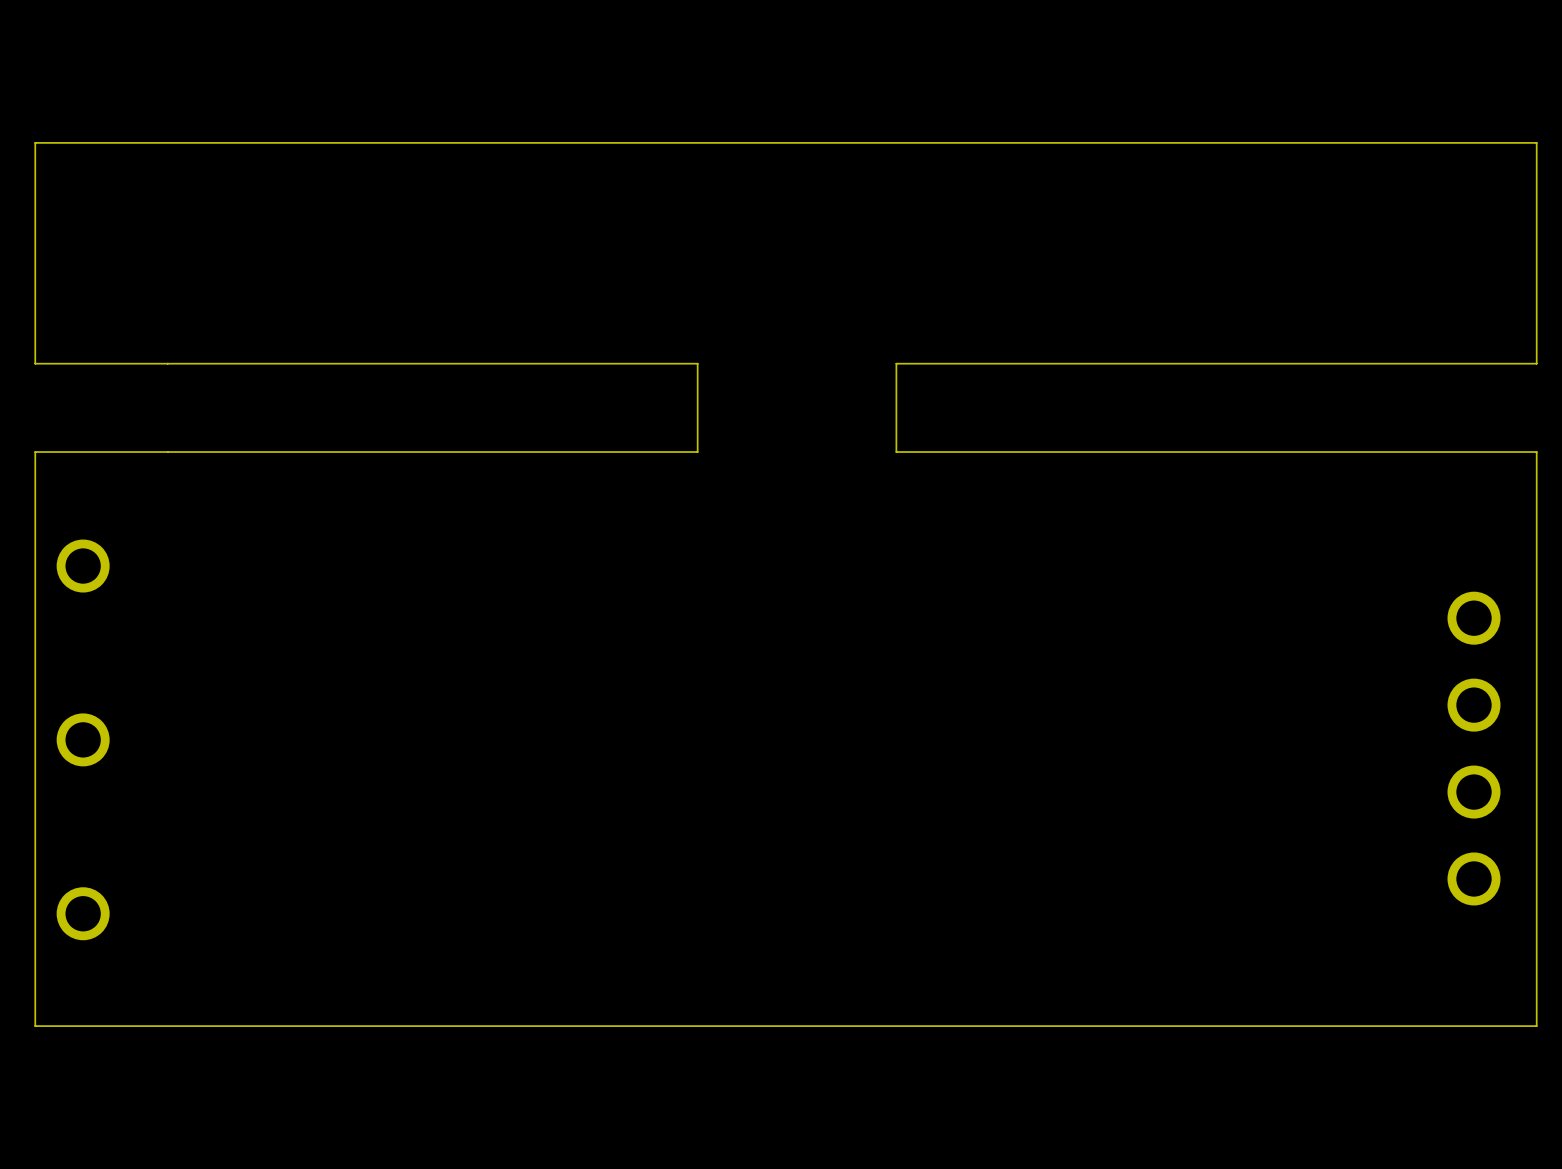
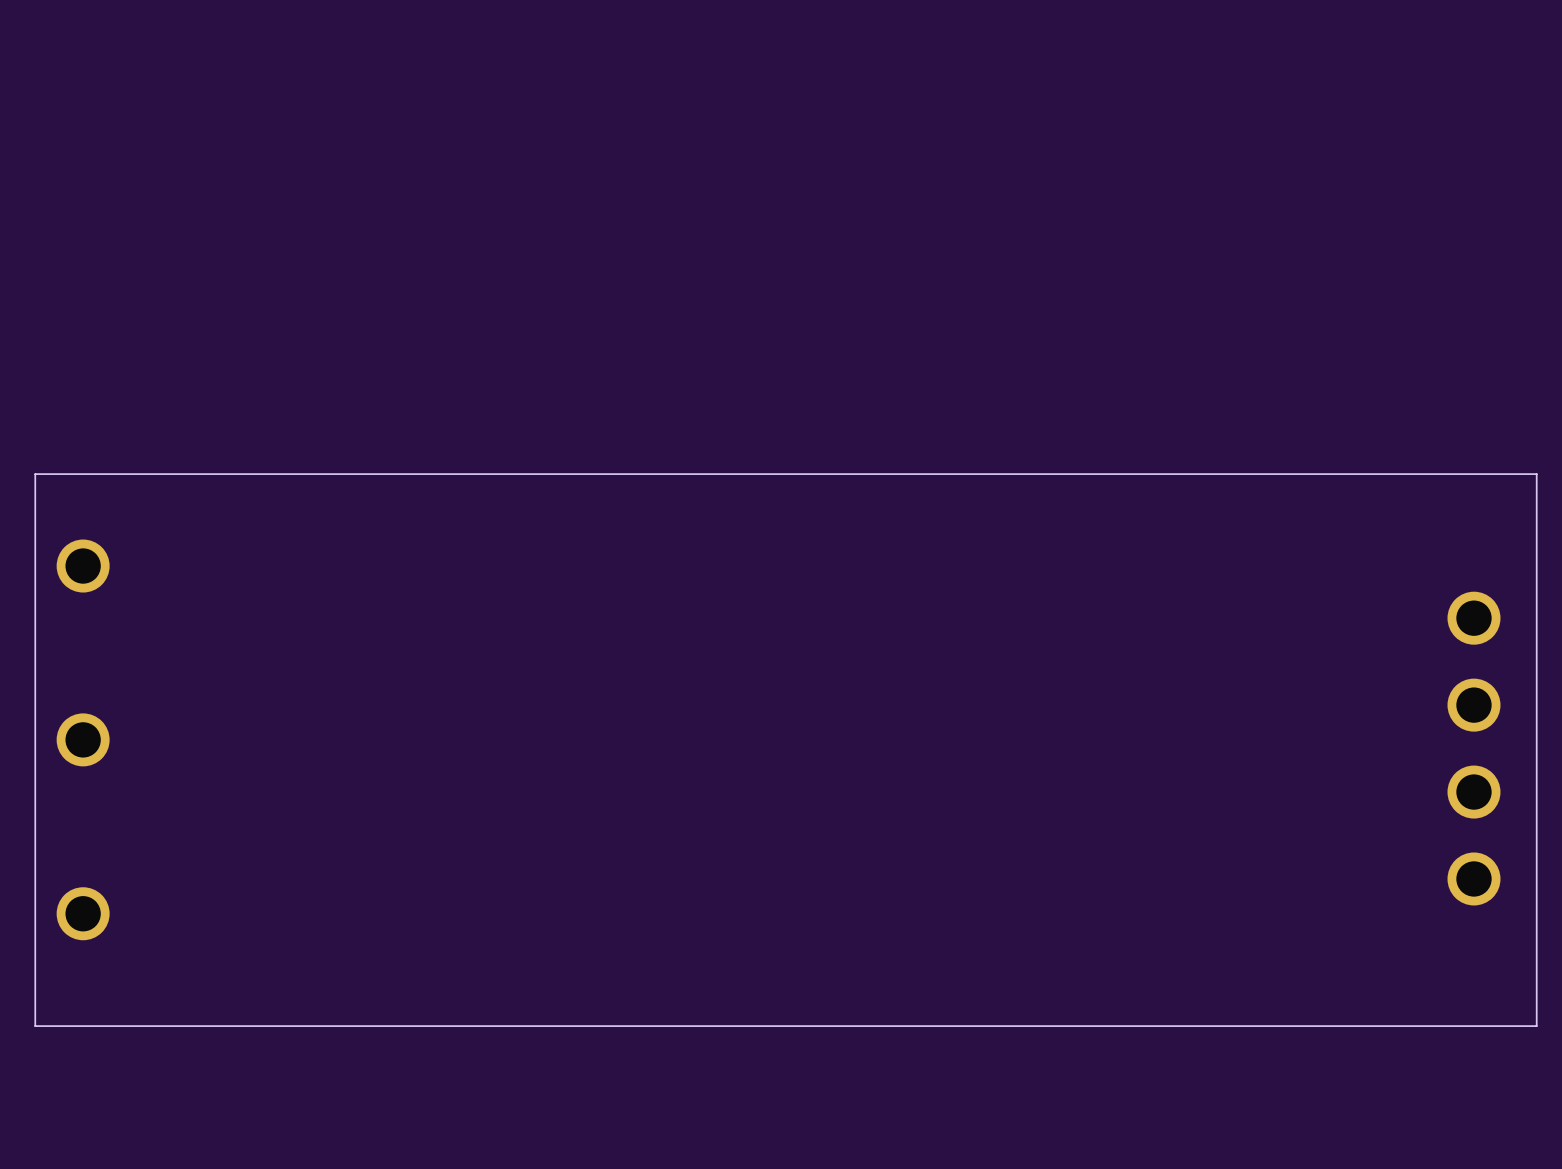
board edge: (1536, 474) (1536, 452) (896, 452) (896, 363) (1536, 363) (1536, 142) (35, 142) (35, 363) (697, 363) (697, 452) (35, 452) (35, 474) -> (1536, 474) (35, 474)

